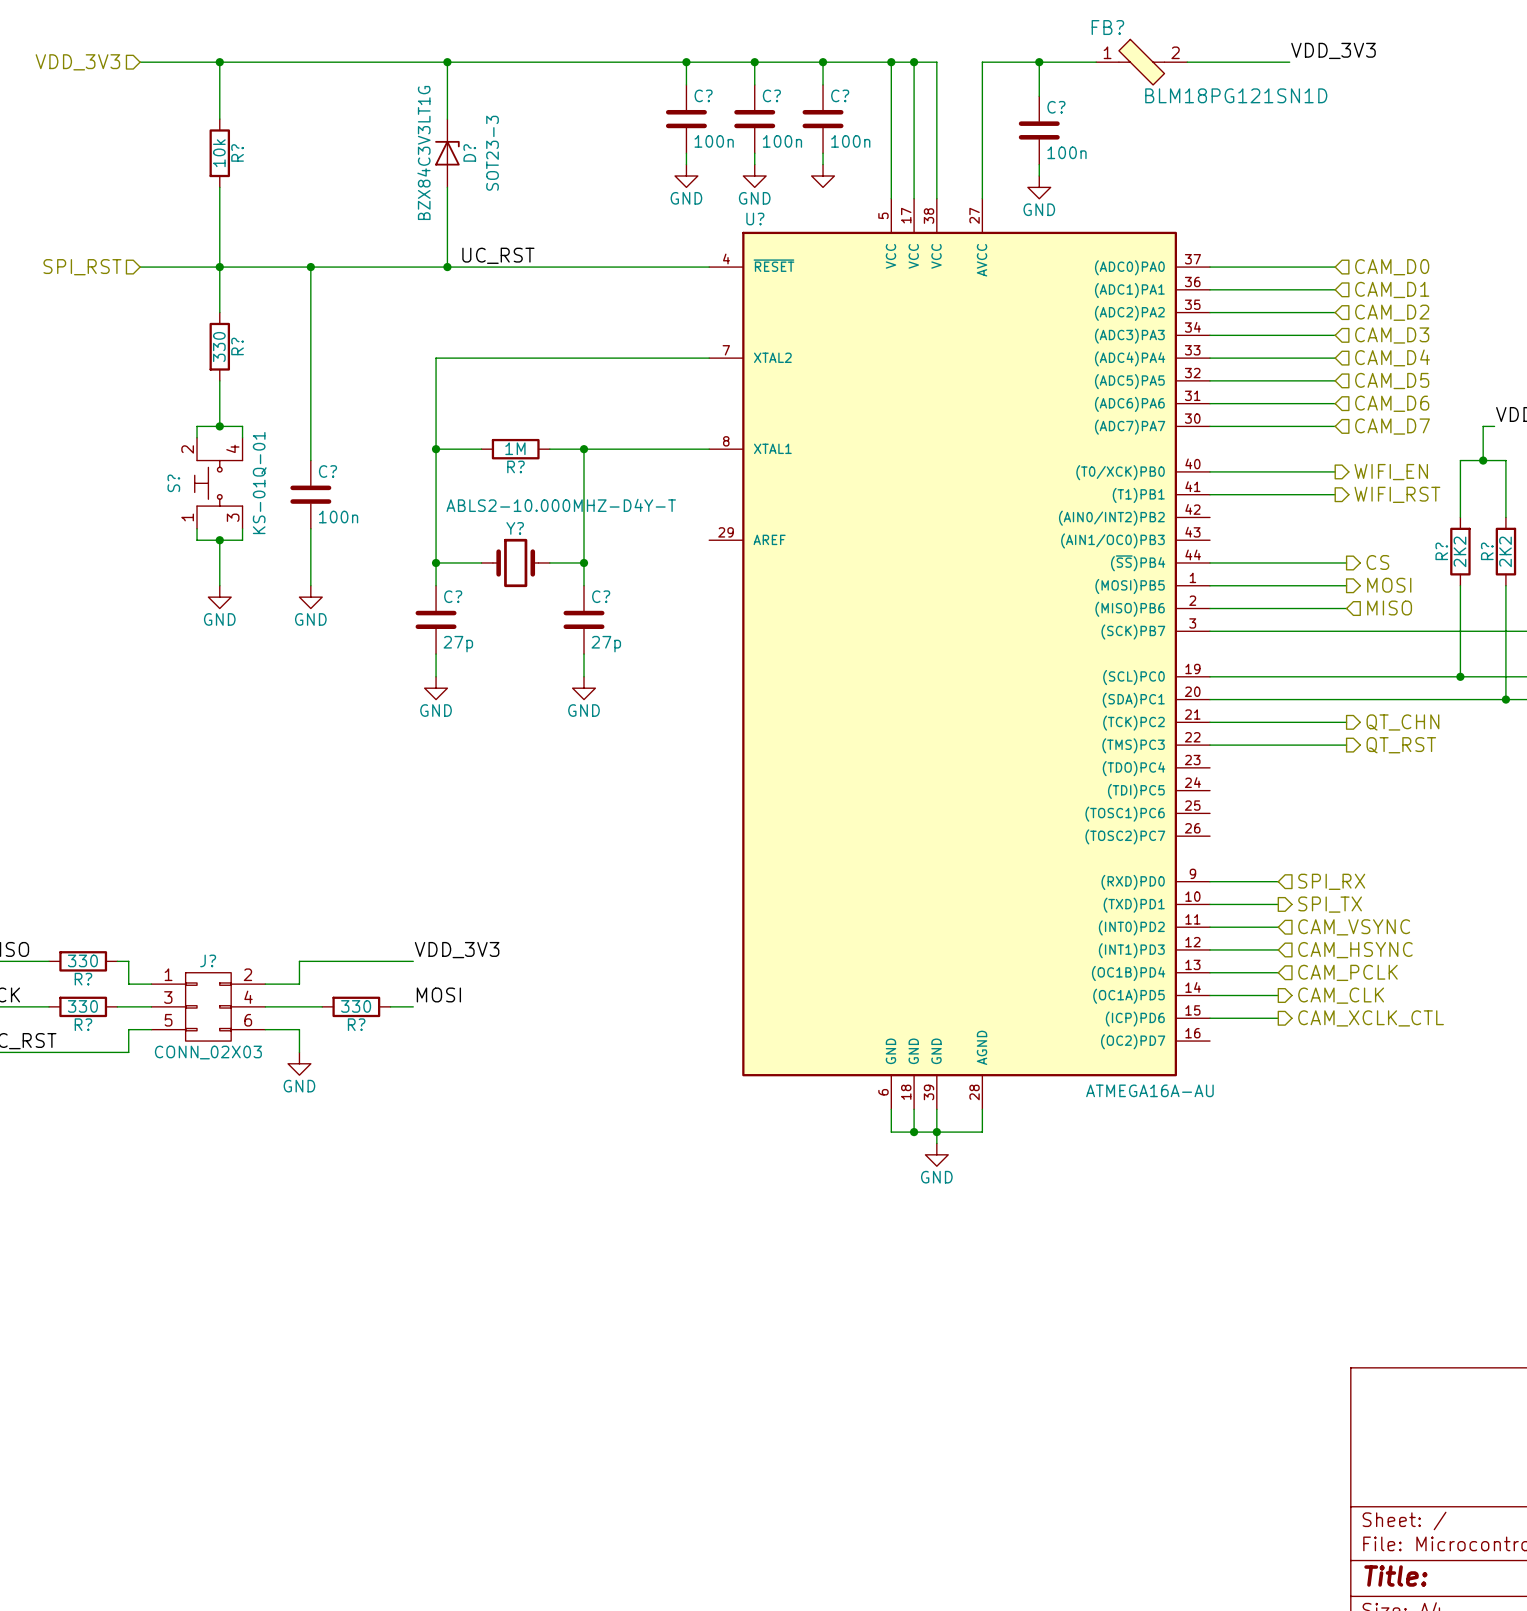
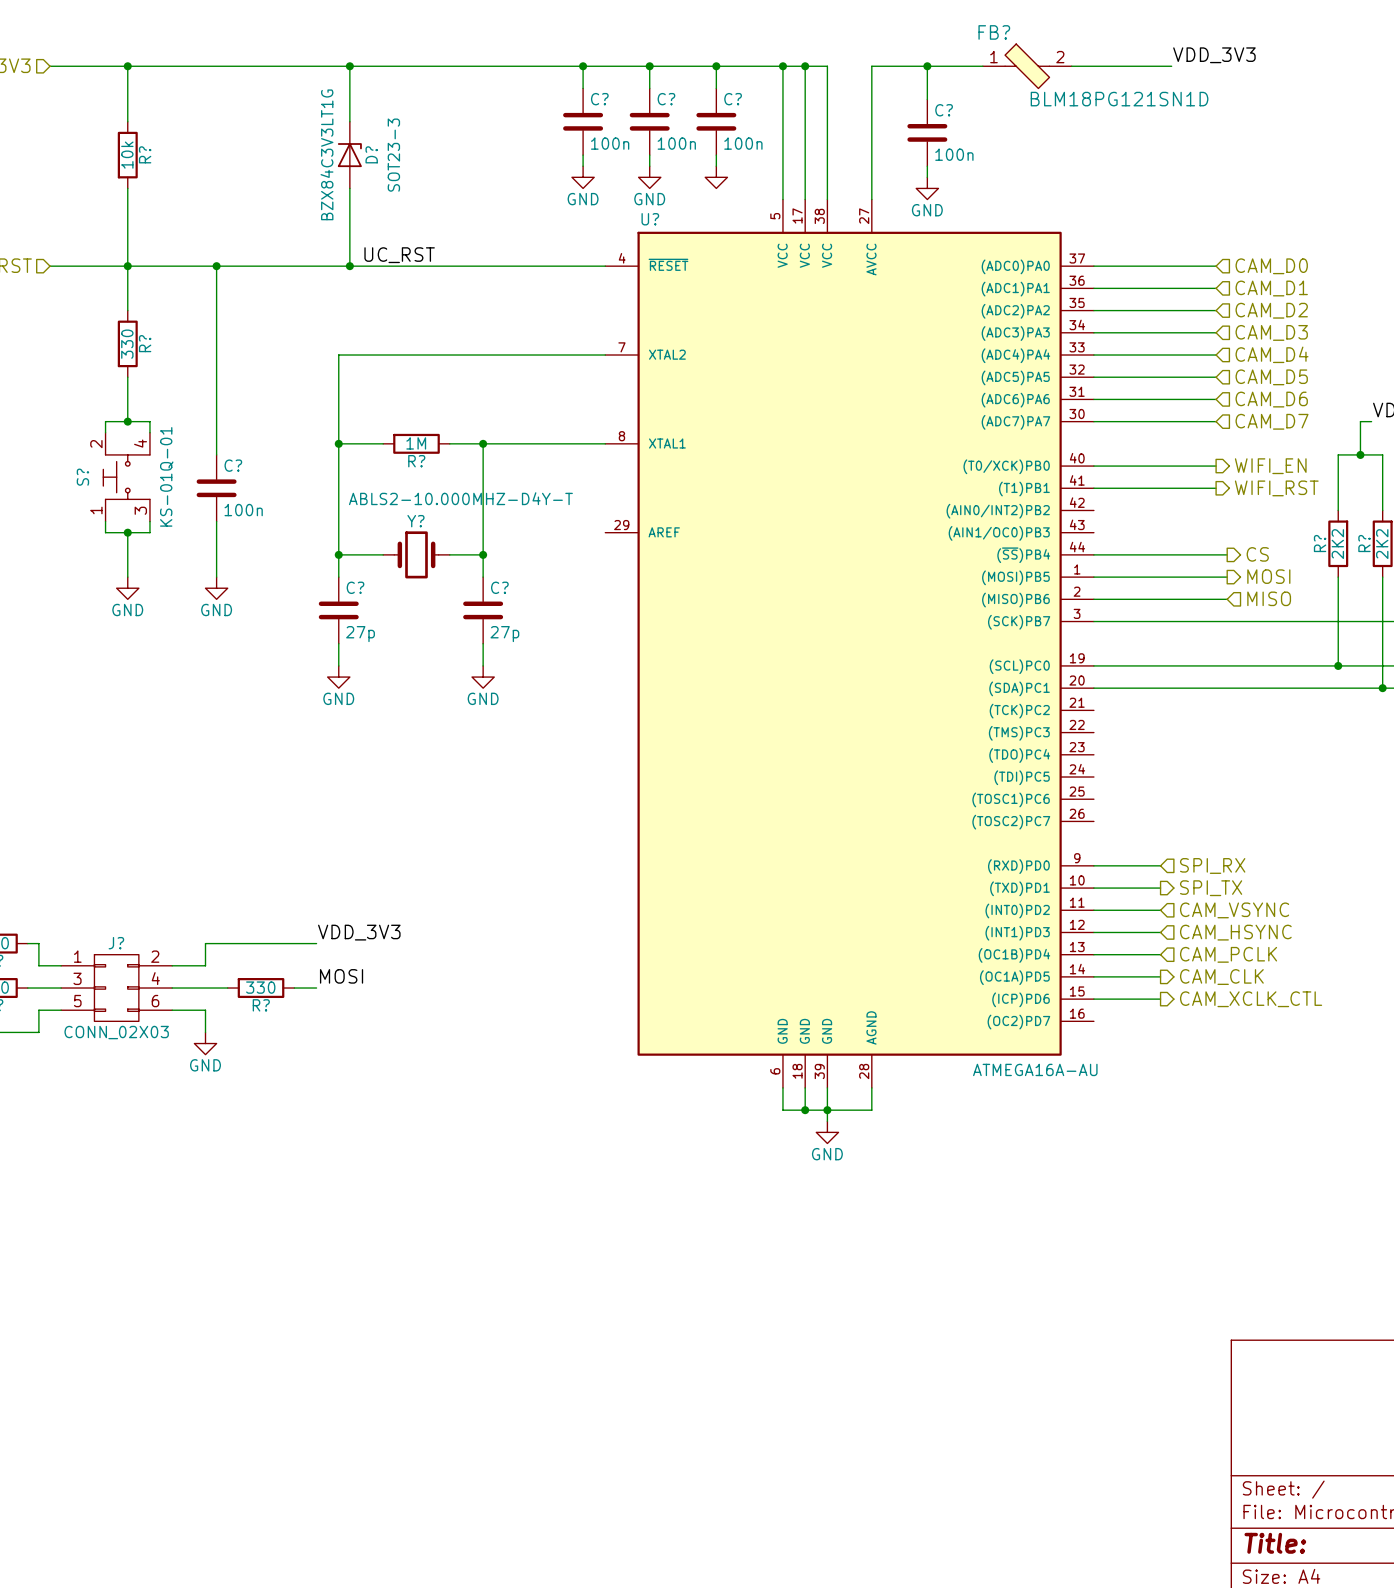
wire: (1210, 722) (1346, 722) -> none
hierarchical label: QT_CHN (1402, 722) -> none
wire: (1210, 745) (1346, 745) -> none
hierarchical label: QT_RST (1401, 745) -> none

